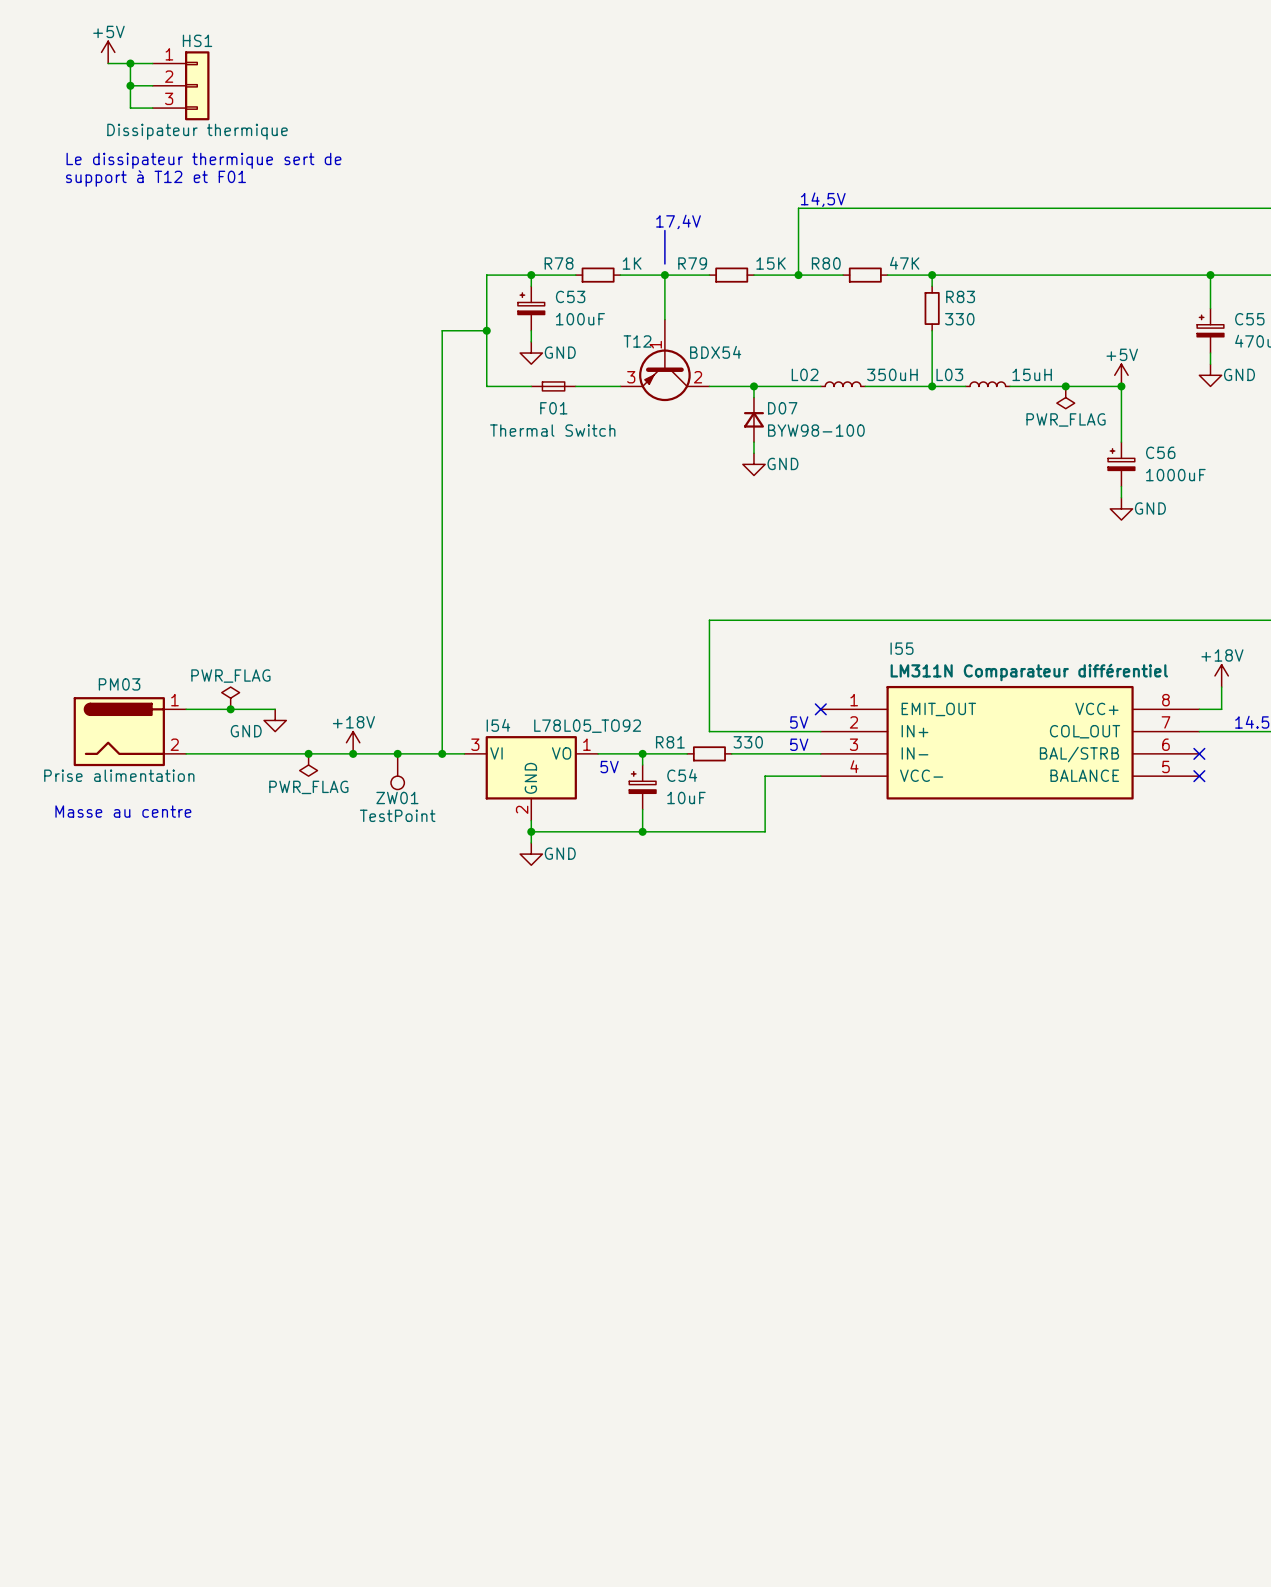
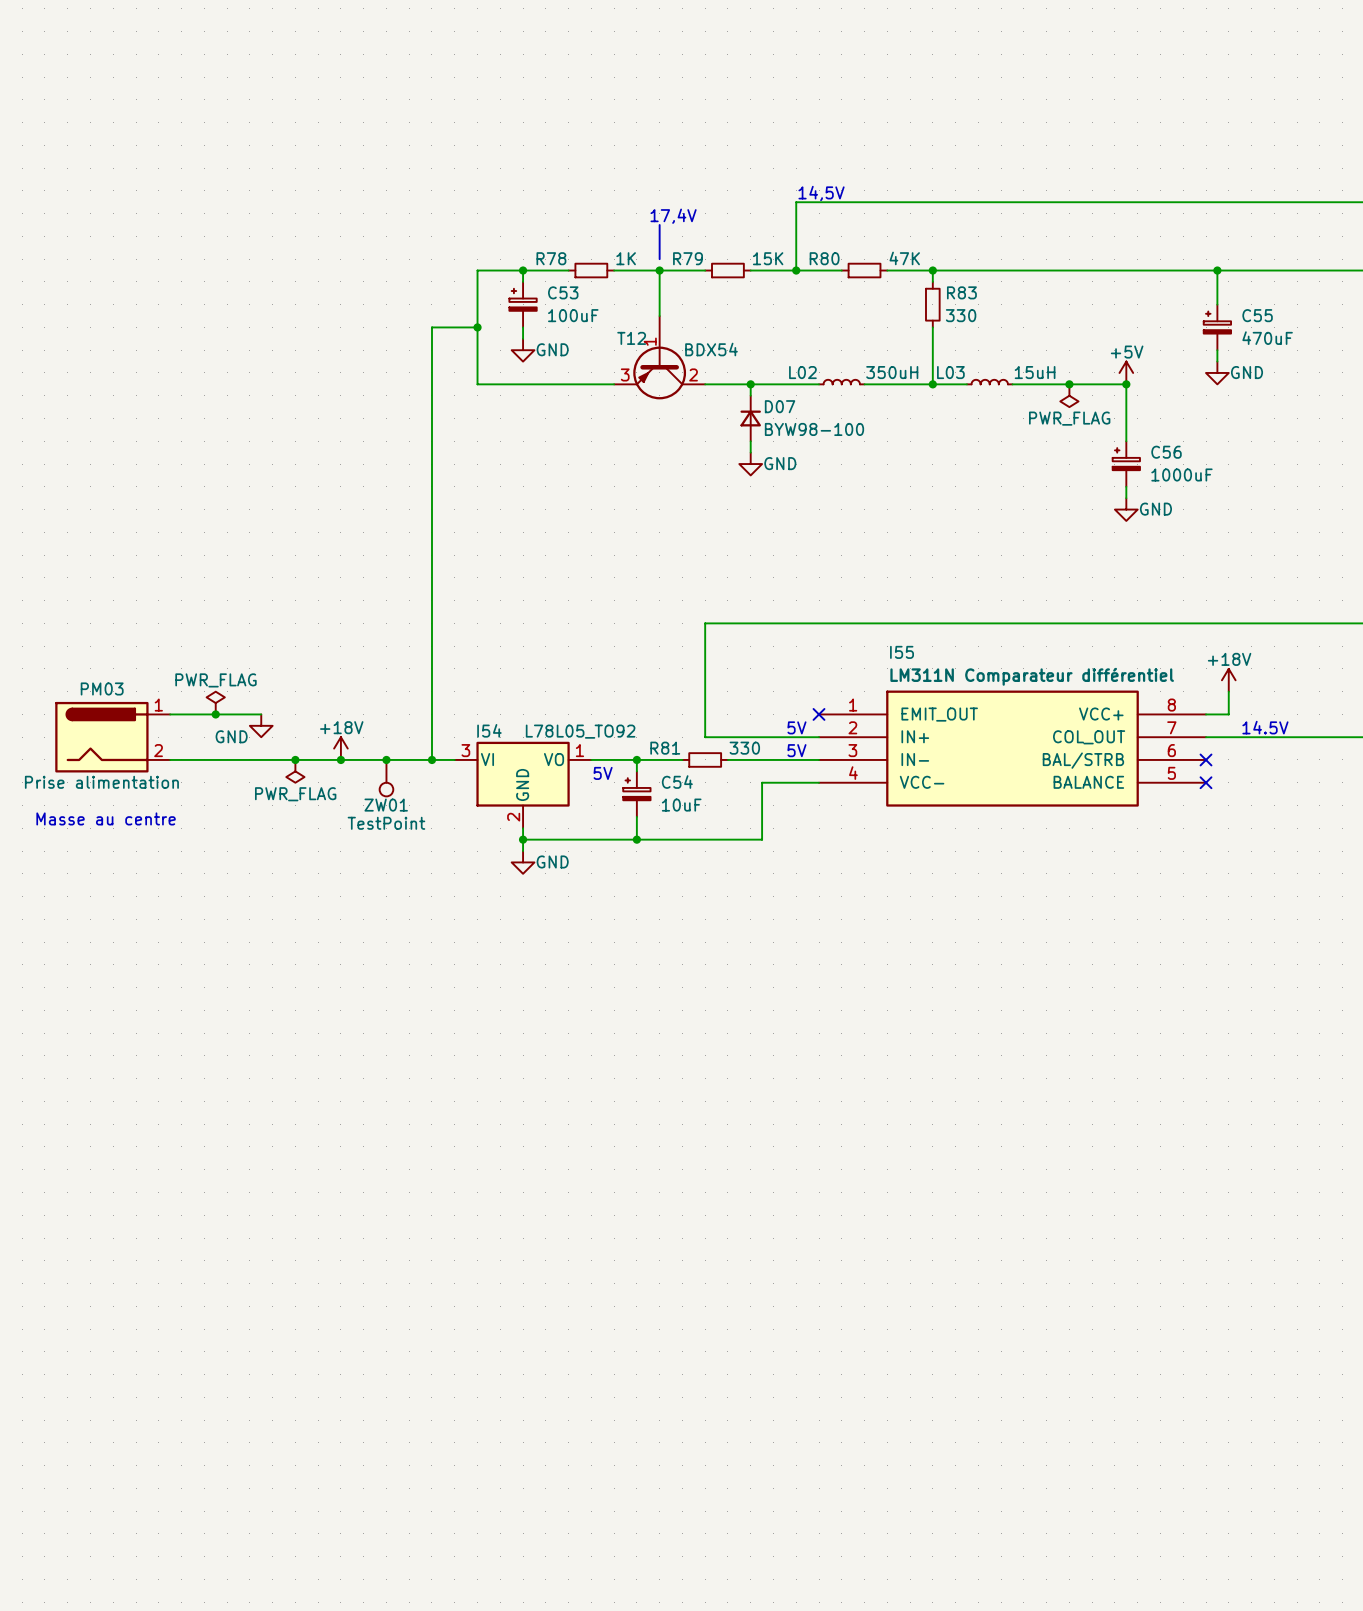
power symbol: +5V (108, 52) -> none
wire: (108, 63) (152, 63) -> none
wire: (130, 63) (130, 108) (152, 108) -> none
junction: (130, 63) -> none
wire: (130, 85) (152, 85) -> none
junction: (130, 85) -> none
HS1: Dissipateur thermique (181, 85) -> none
text: Le dissipateur thermique sert de (203, 160) -> none
text: support à T12 et F01 (155, 178) -> none
F01: Thermal Switch (553, 386) -> none

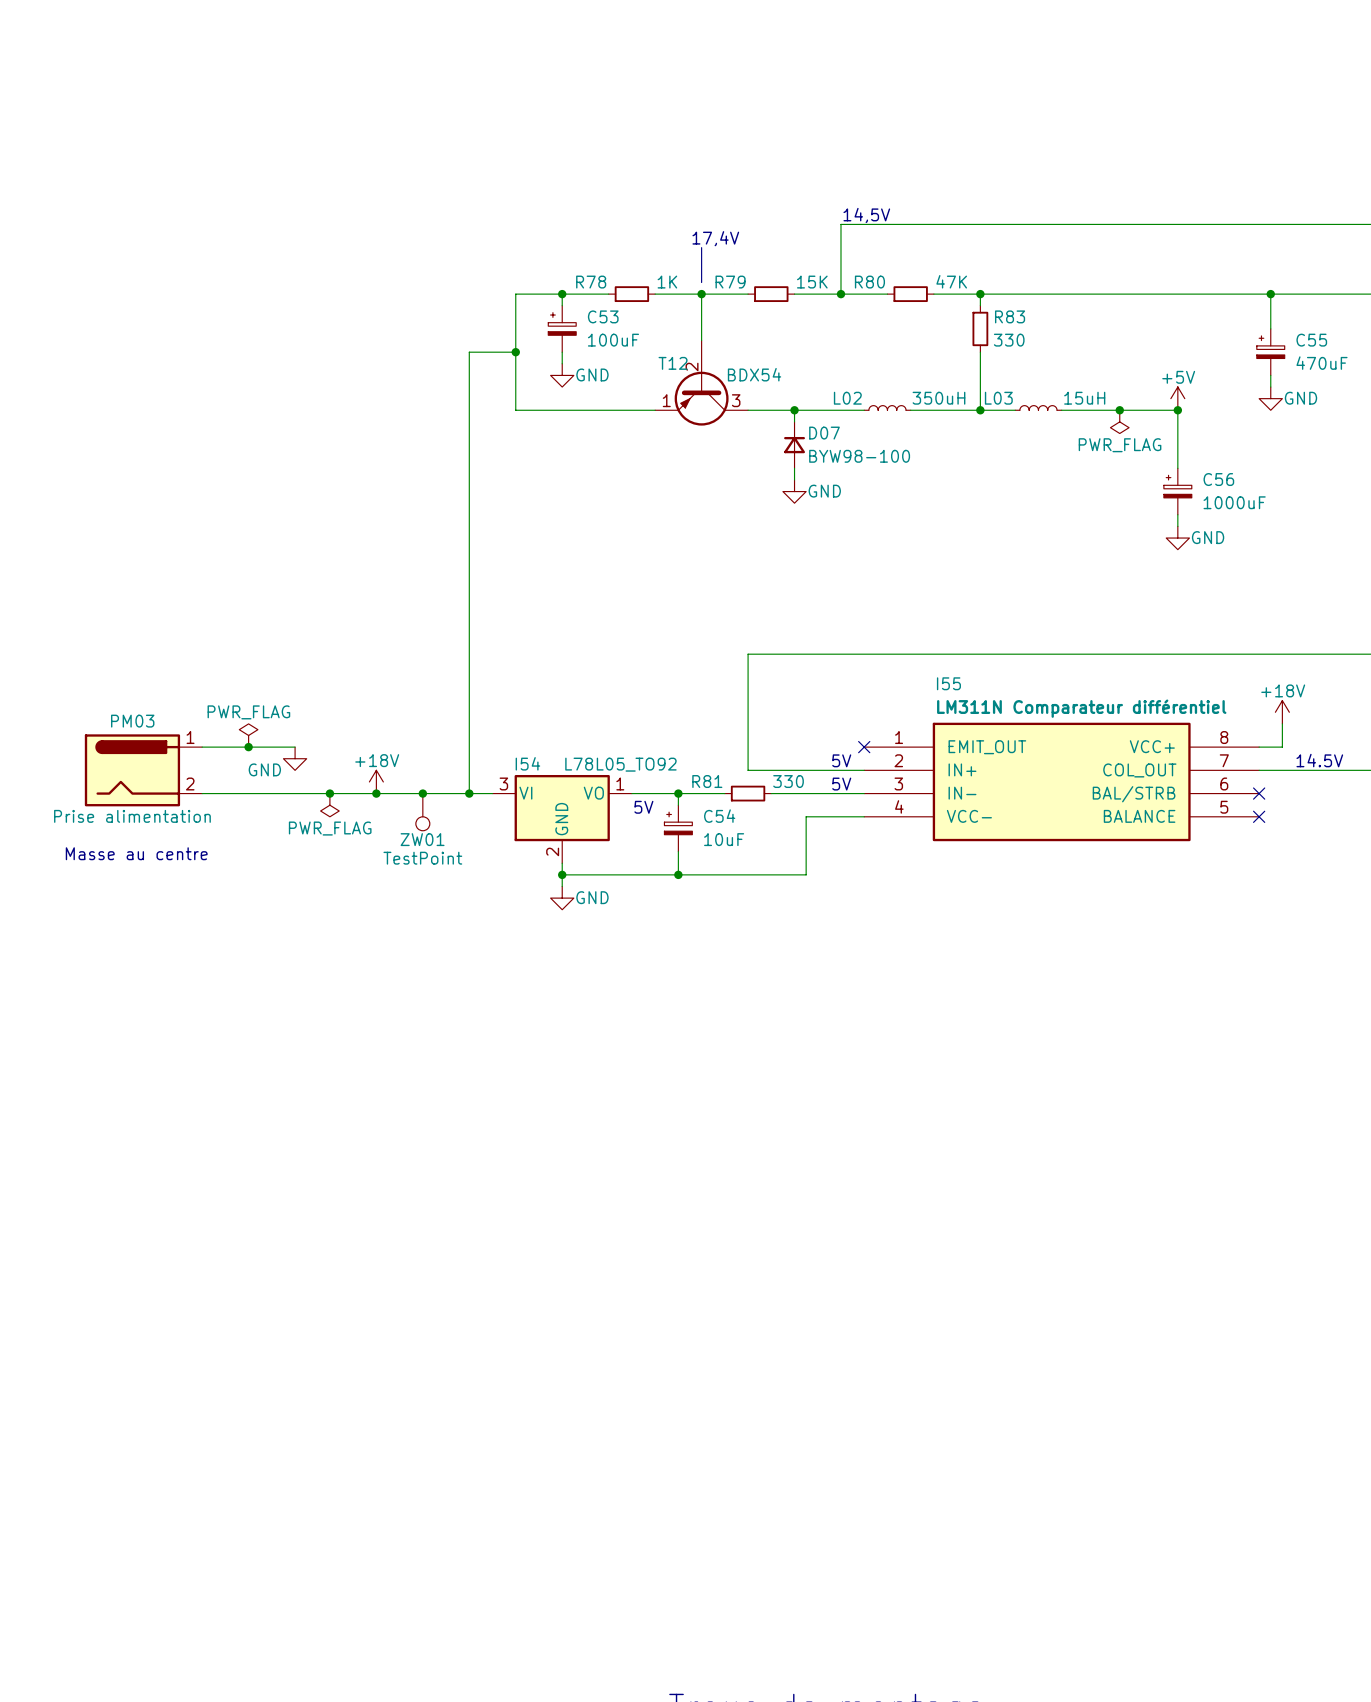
T12 pin number: 1 (650, 341) -> 2 (692, 366)
T12 pin number: 3 (625, 374) -> 1 (666, 400)
T12 pin number: 2 (693, 374) -> 3 (736, 400)

